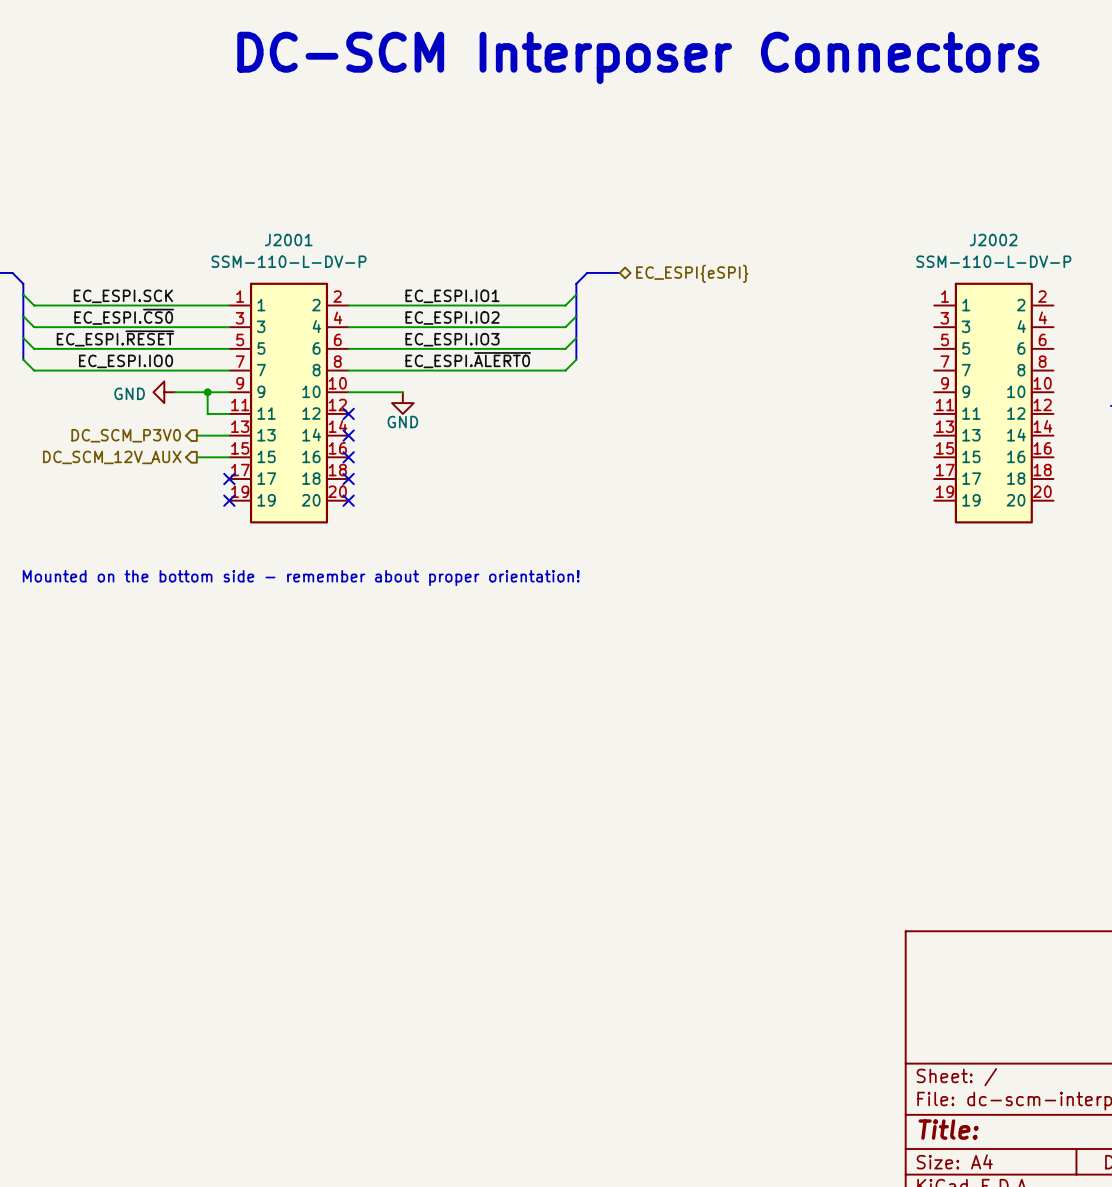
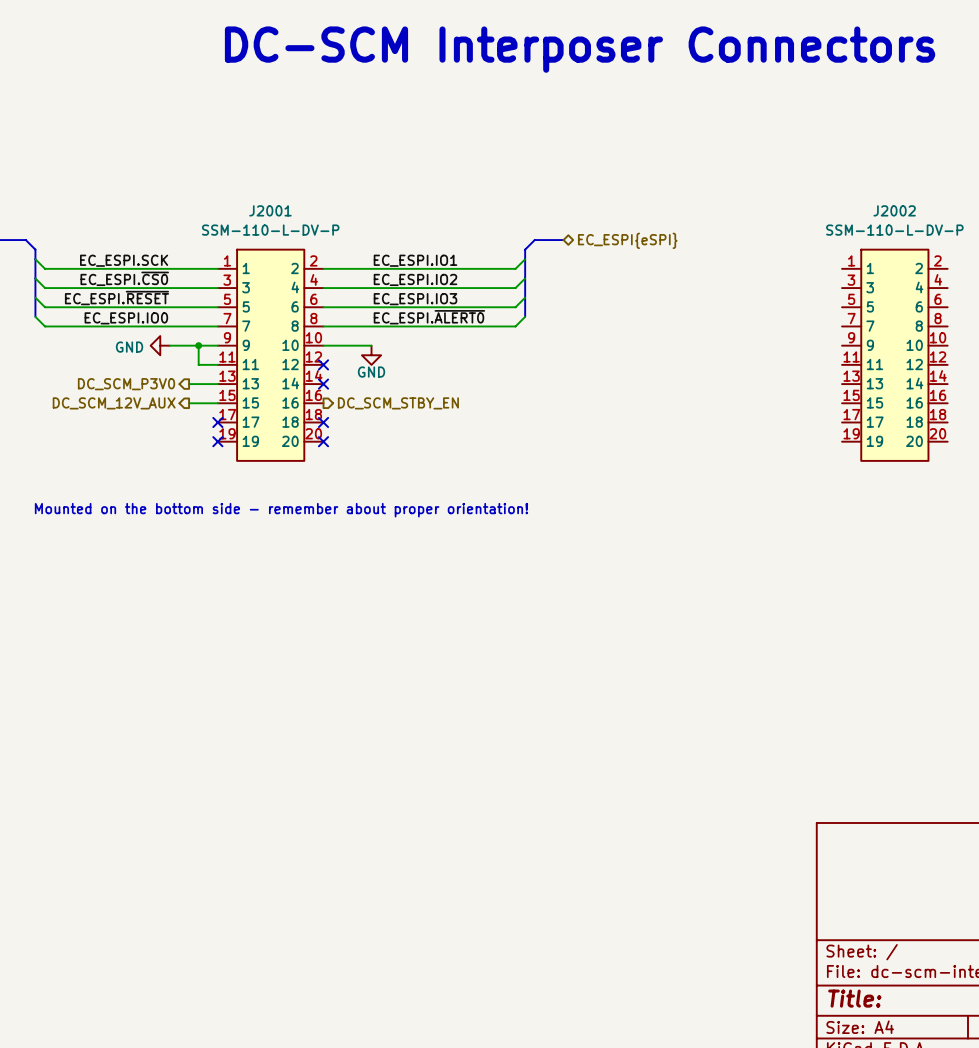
no-connect mark: (348, 457) -> none
hierarchical label: none -> DC_SCM_STBY_EN (398, 403)

